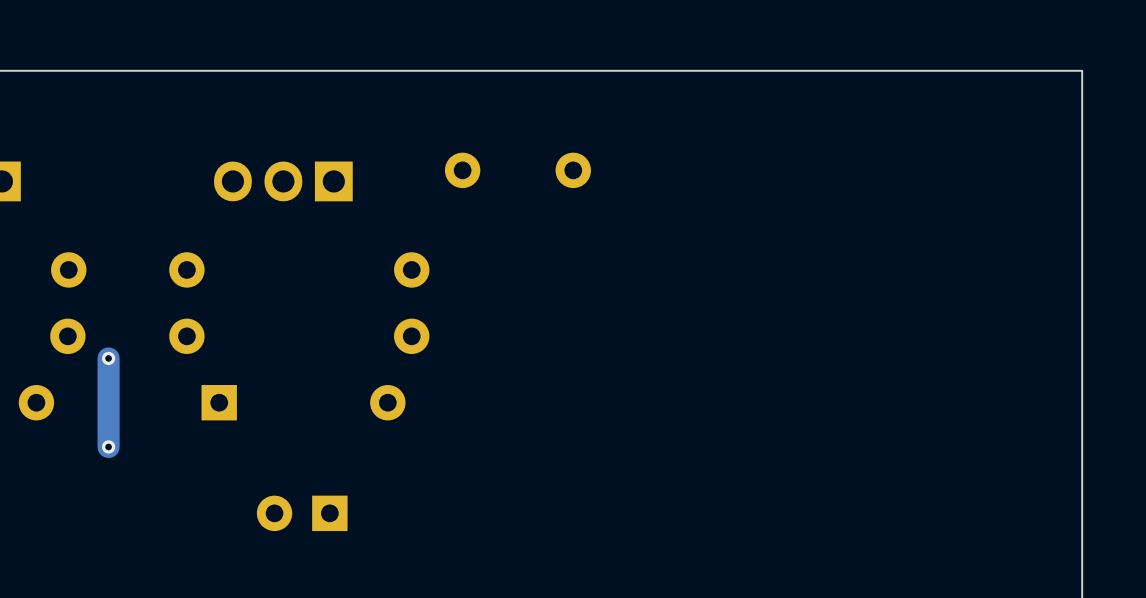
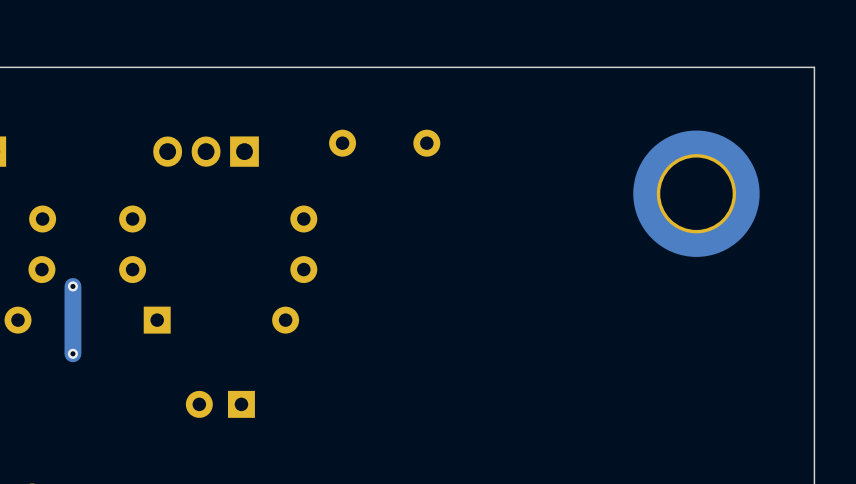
part: none -> (696, 193)

